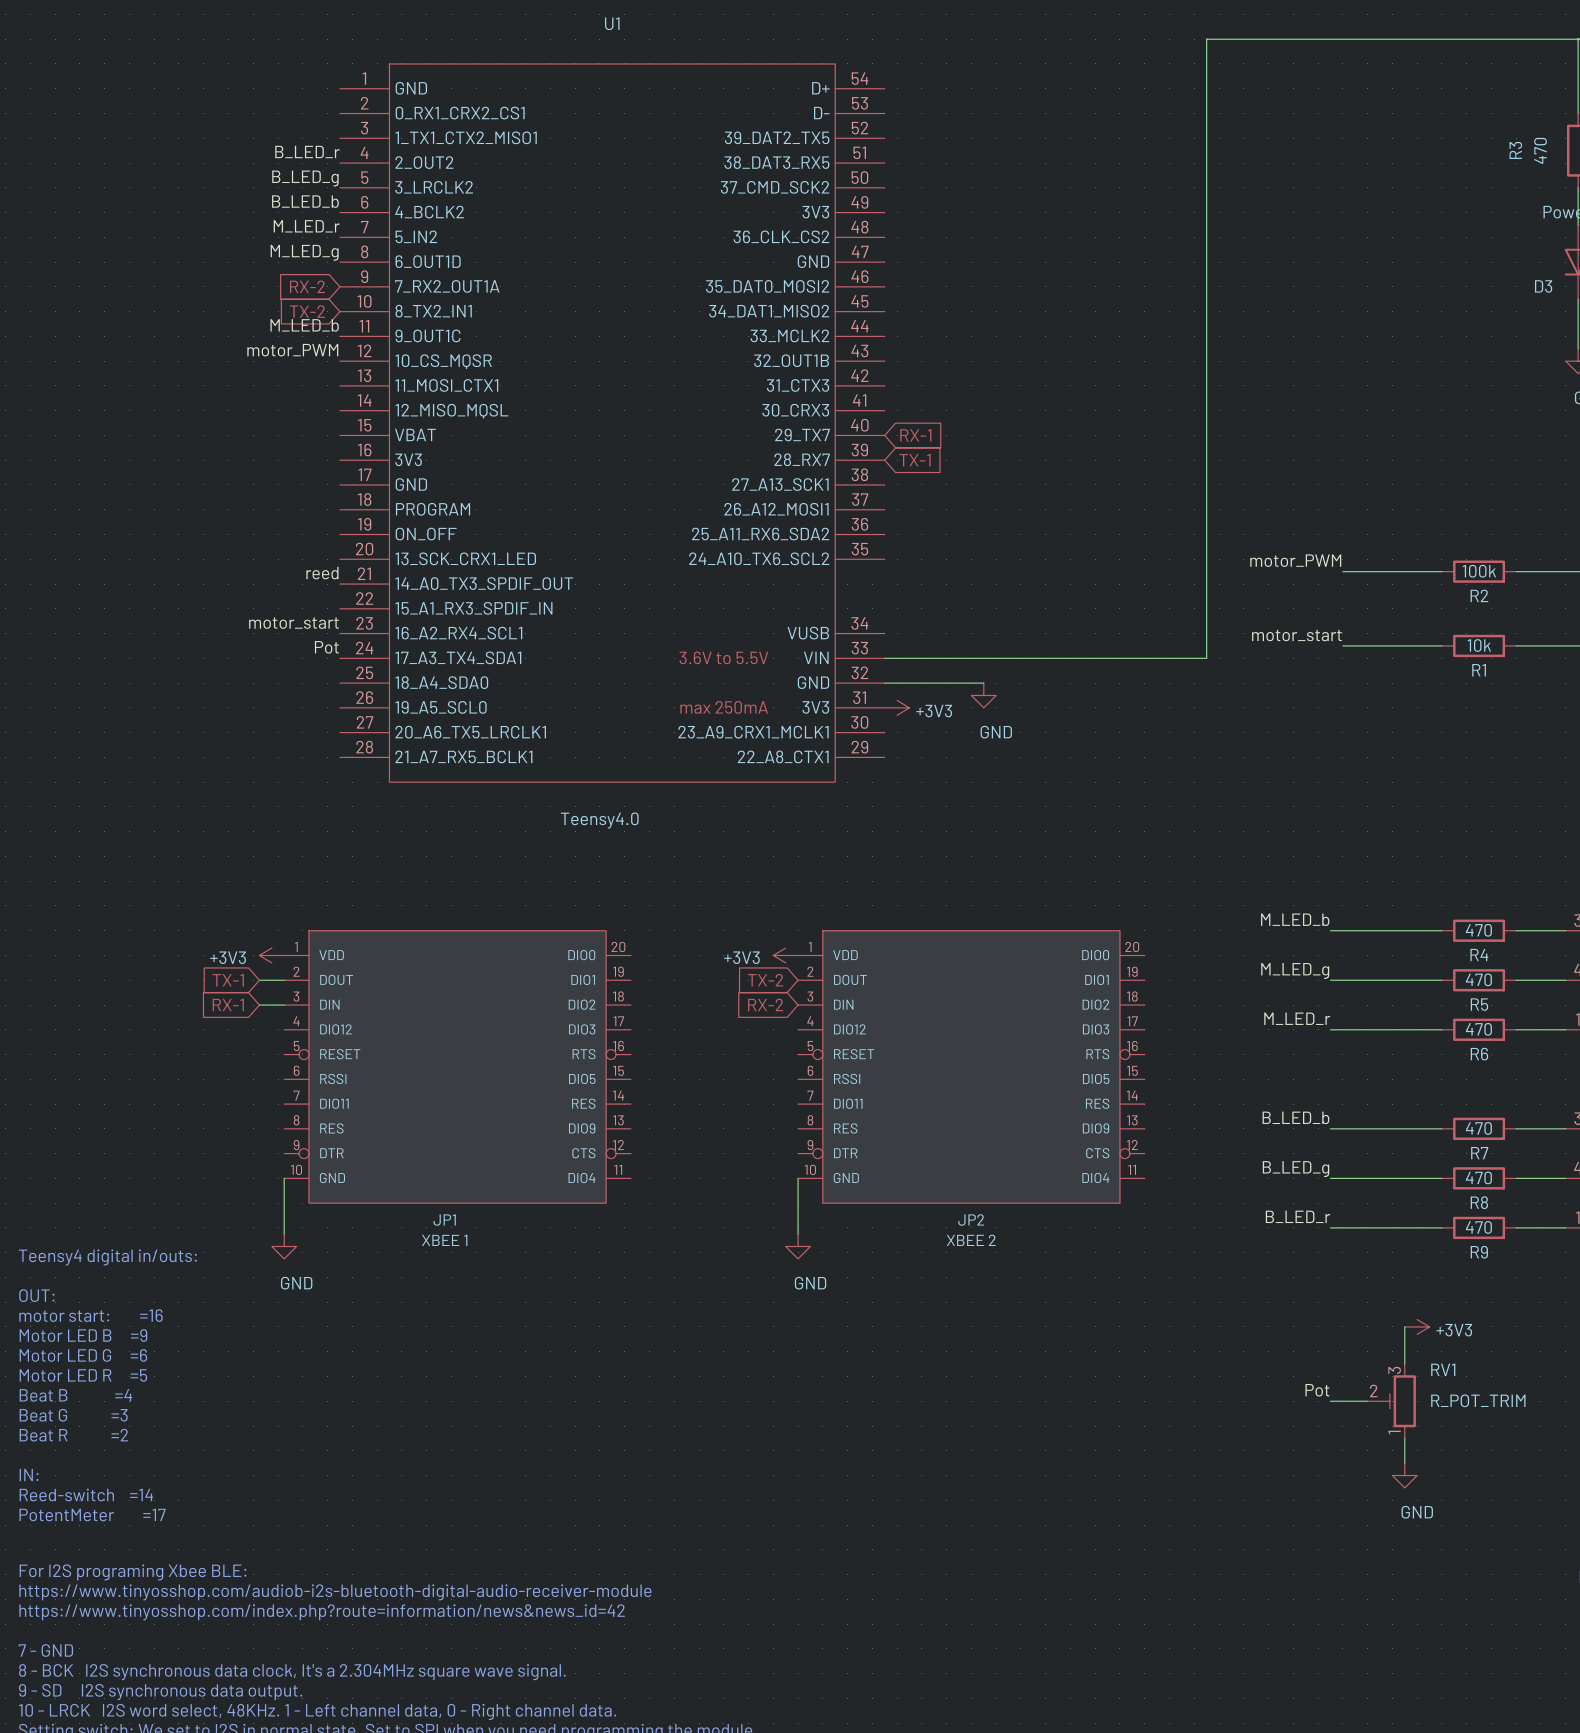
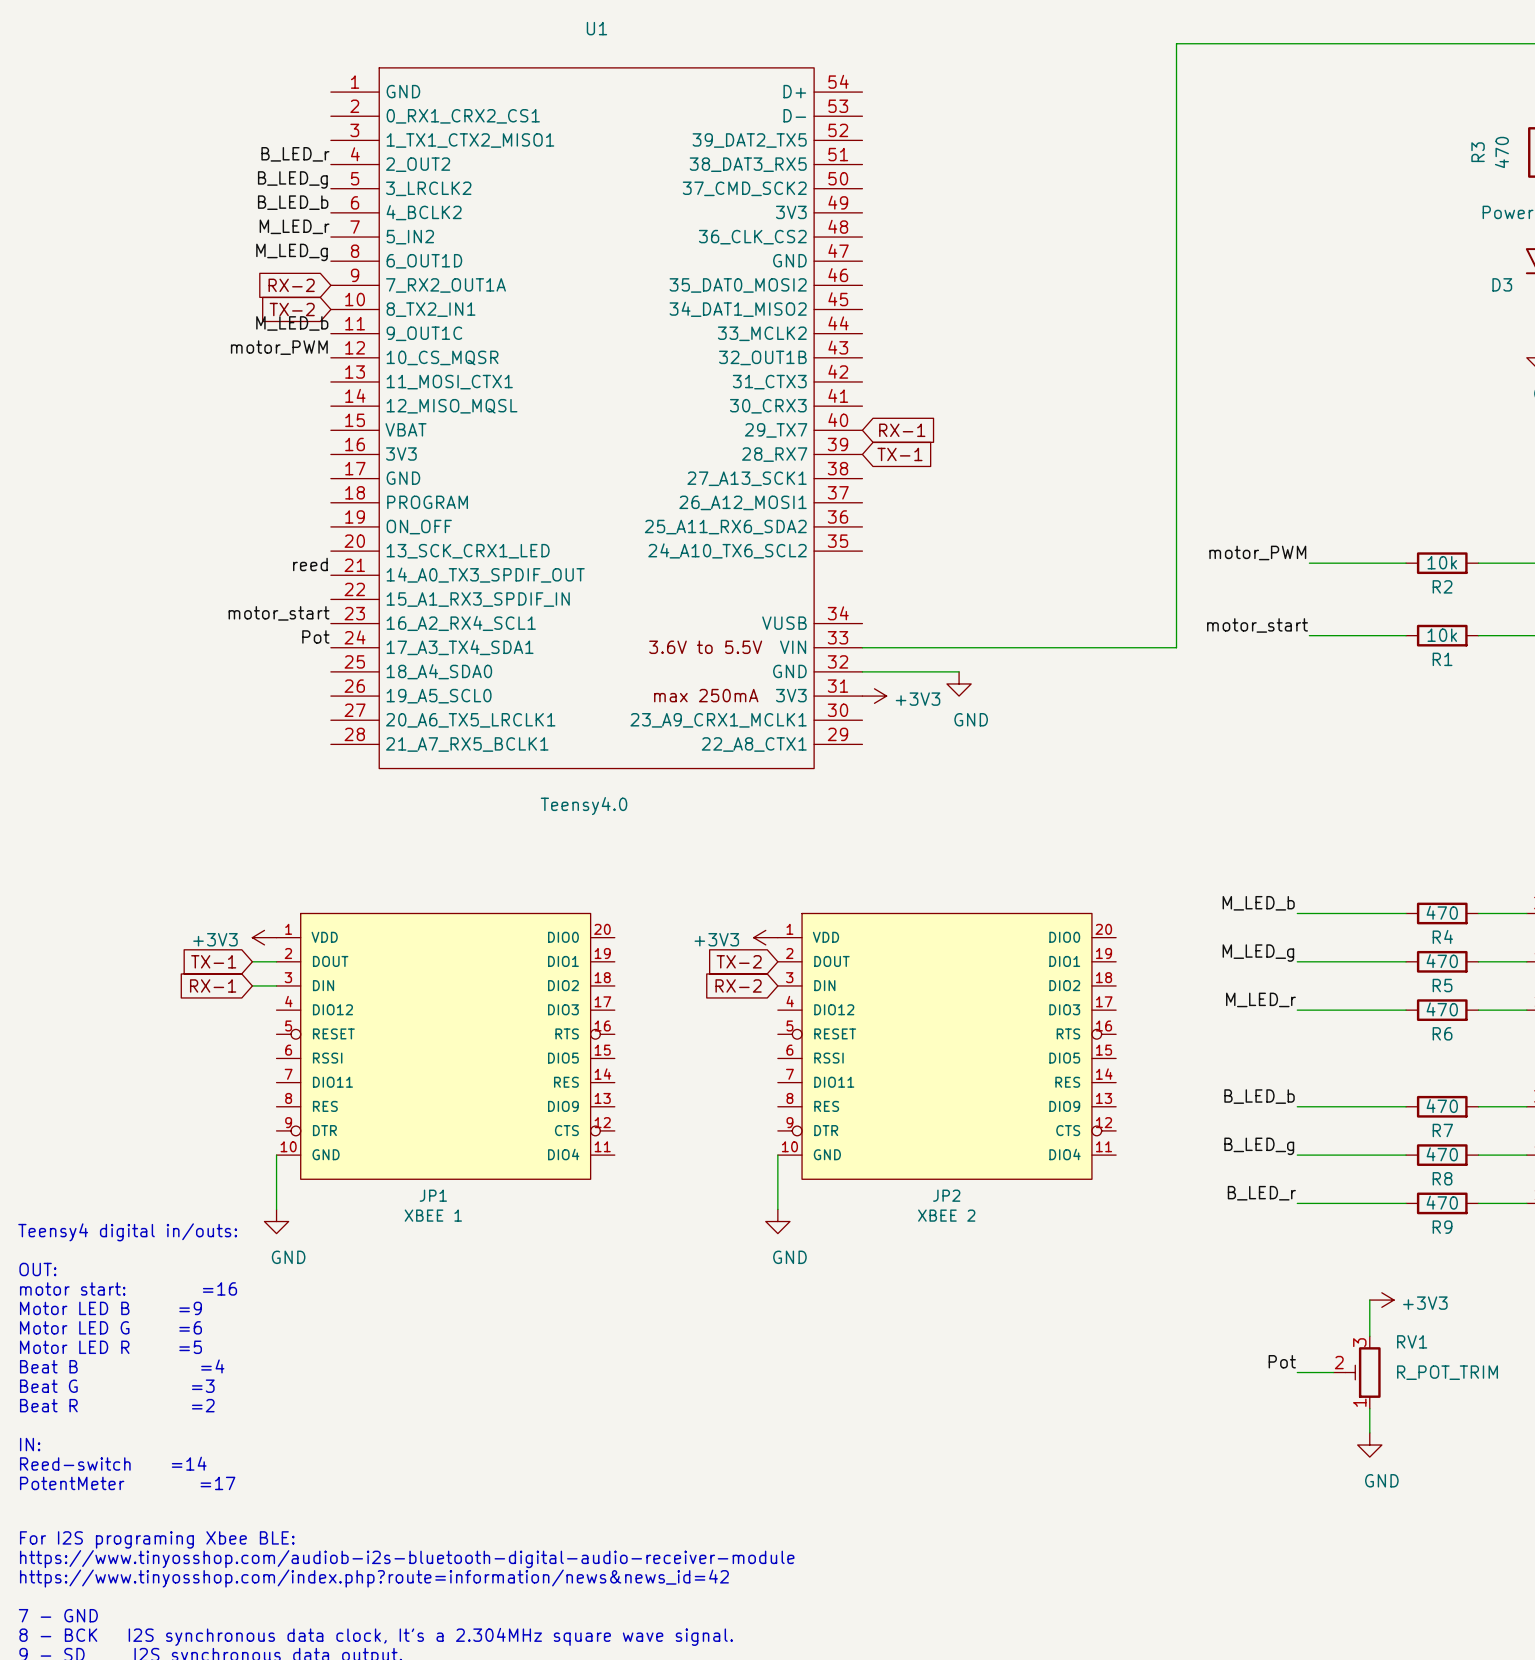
R2 value: 100k (1479, 571) -> 10k (1442, 562)

